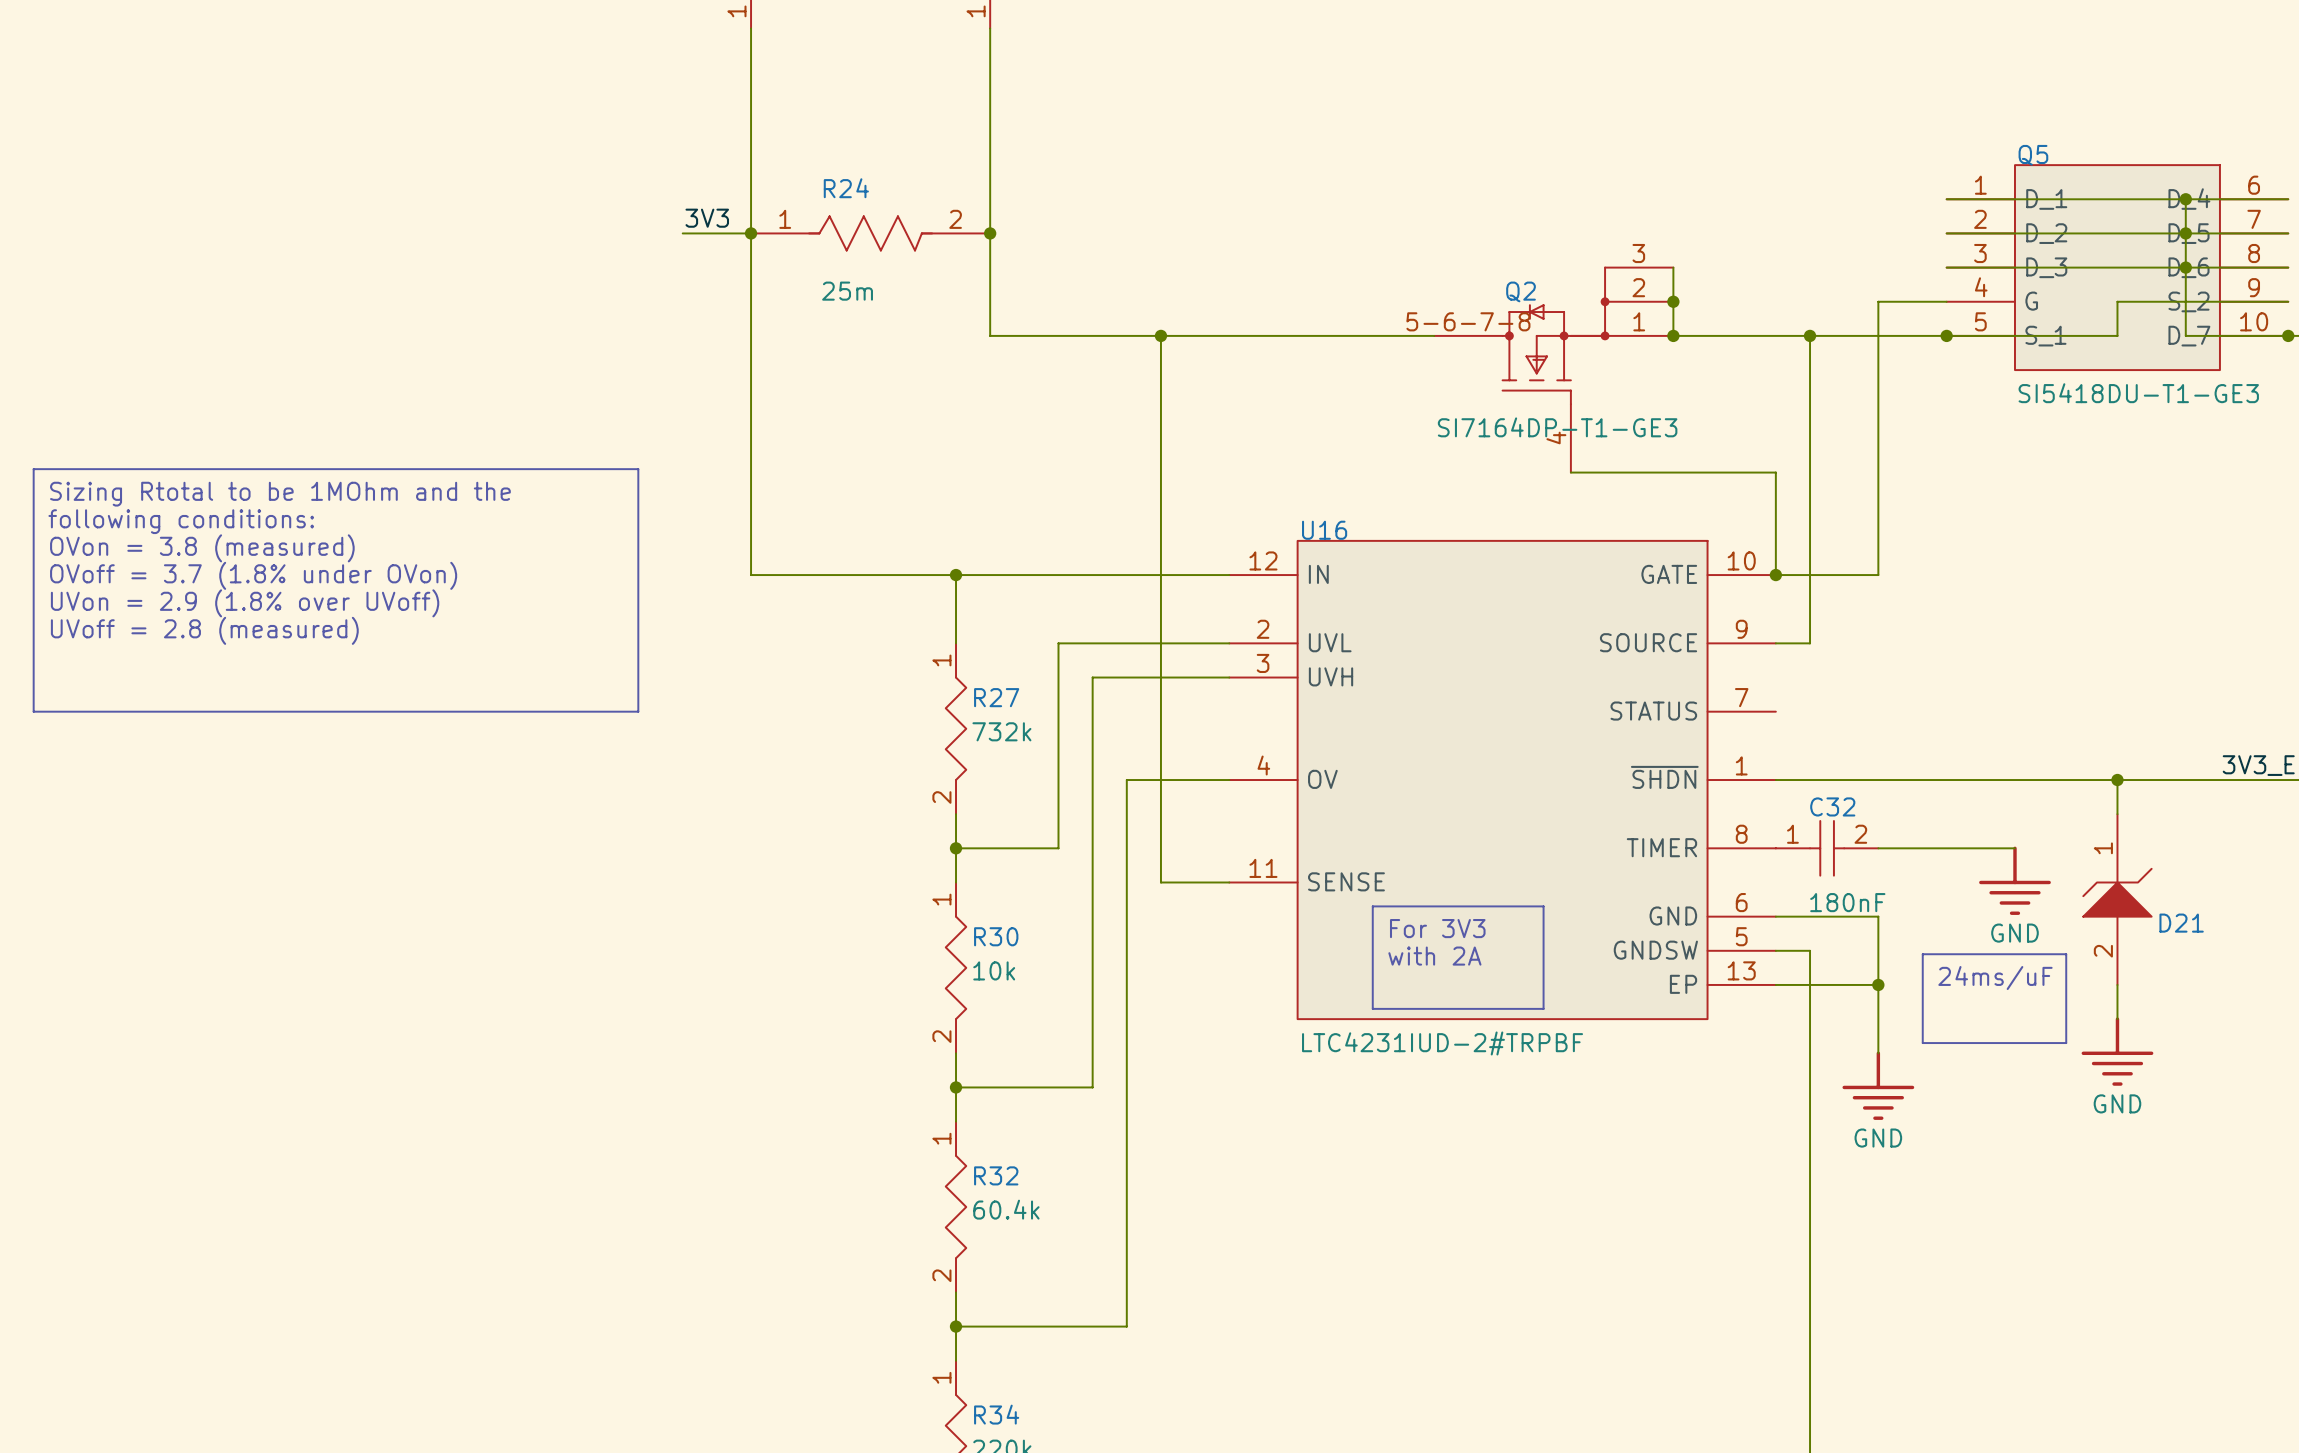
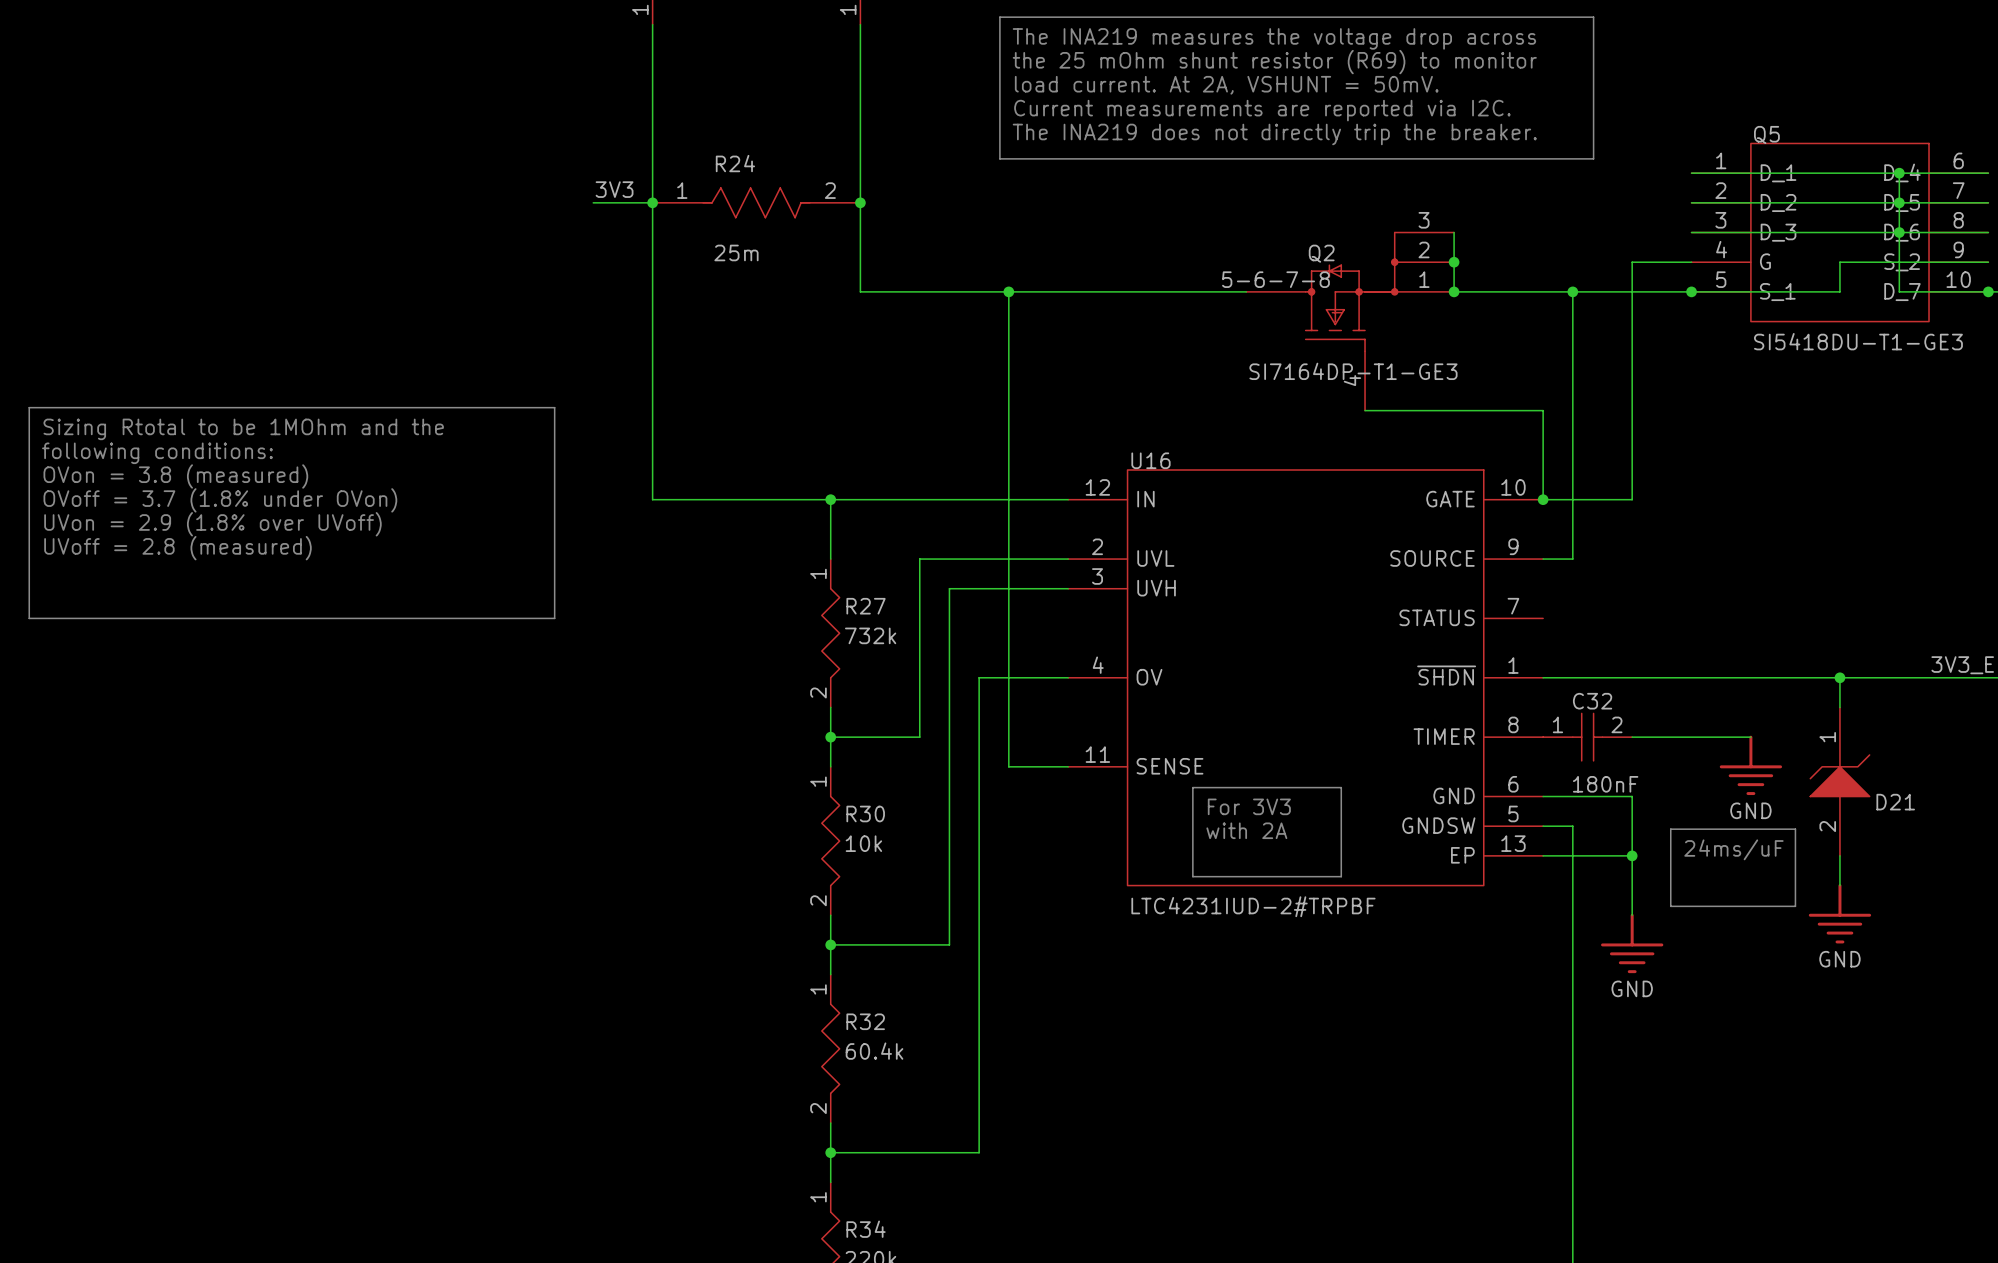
line: none -> (999, 17) (1593, 17) (1593, 158) (999, 158) (999, 17)
text: none -> The INA219 measures the voltage drop across (1274, 38)
text: none -> the 25 mOhm shunt resistor (R69) to monitor (1274, 62)
text: none -> load current. At 2A, VSHUNT = 50mV. (1226, 85)
text: none -> Current measurements are reported via I2C. (1262, 110)
text: none -> The INA219 does not directly trip the breaker. (1274, 134)

